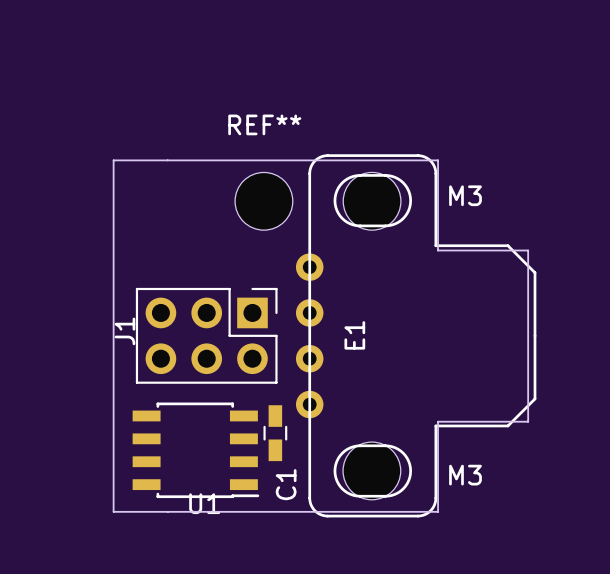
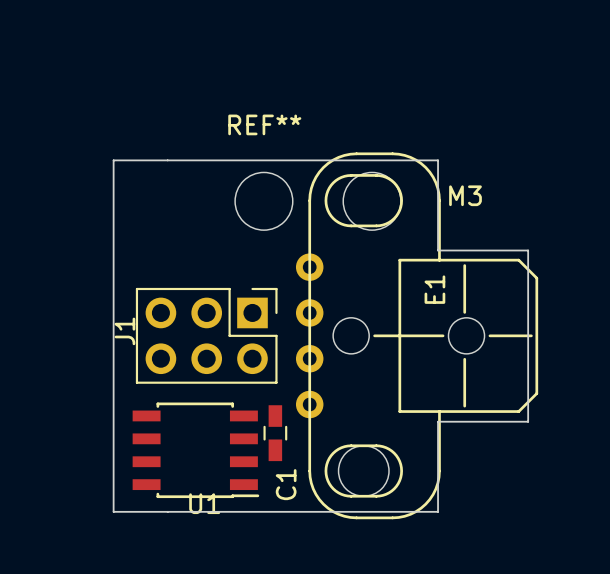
E1 footprint: [295, 154, 537, 518] -> [295, 152, 539, 520]
E1 name position: E1 (354, 335) -> E1 (434, 289)
M3: (371, 470) -> none

